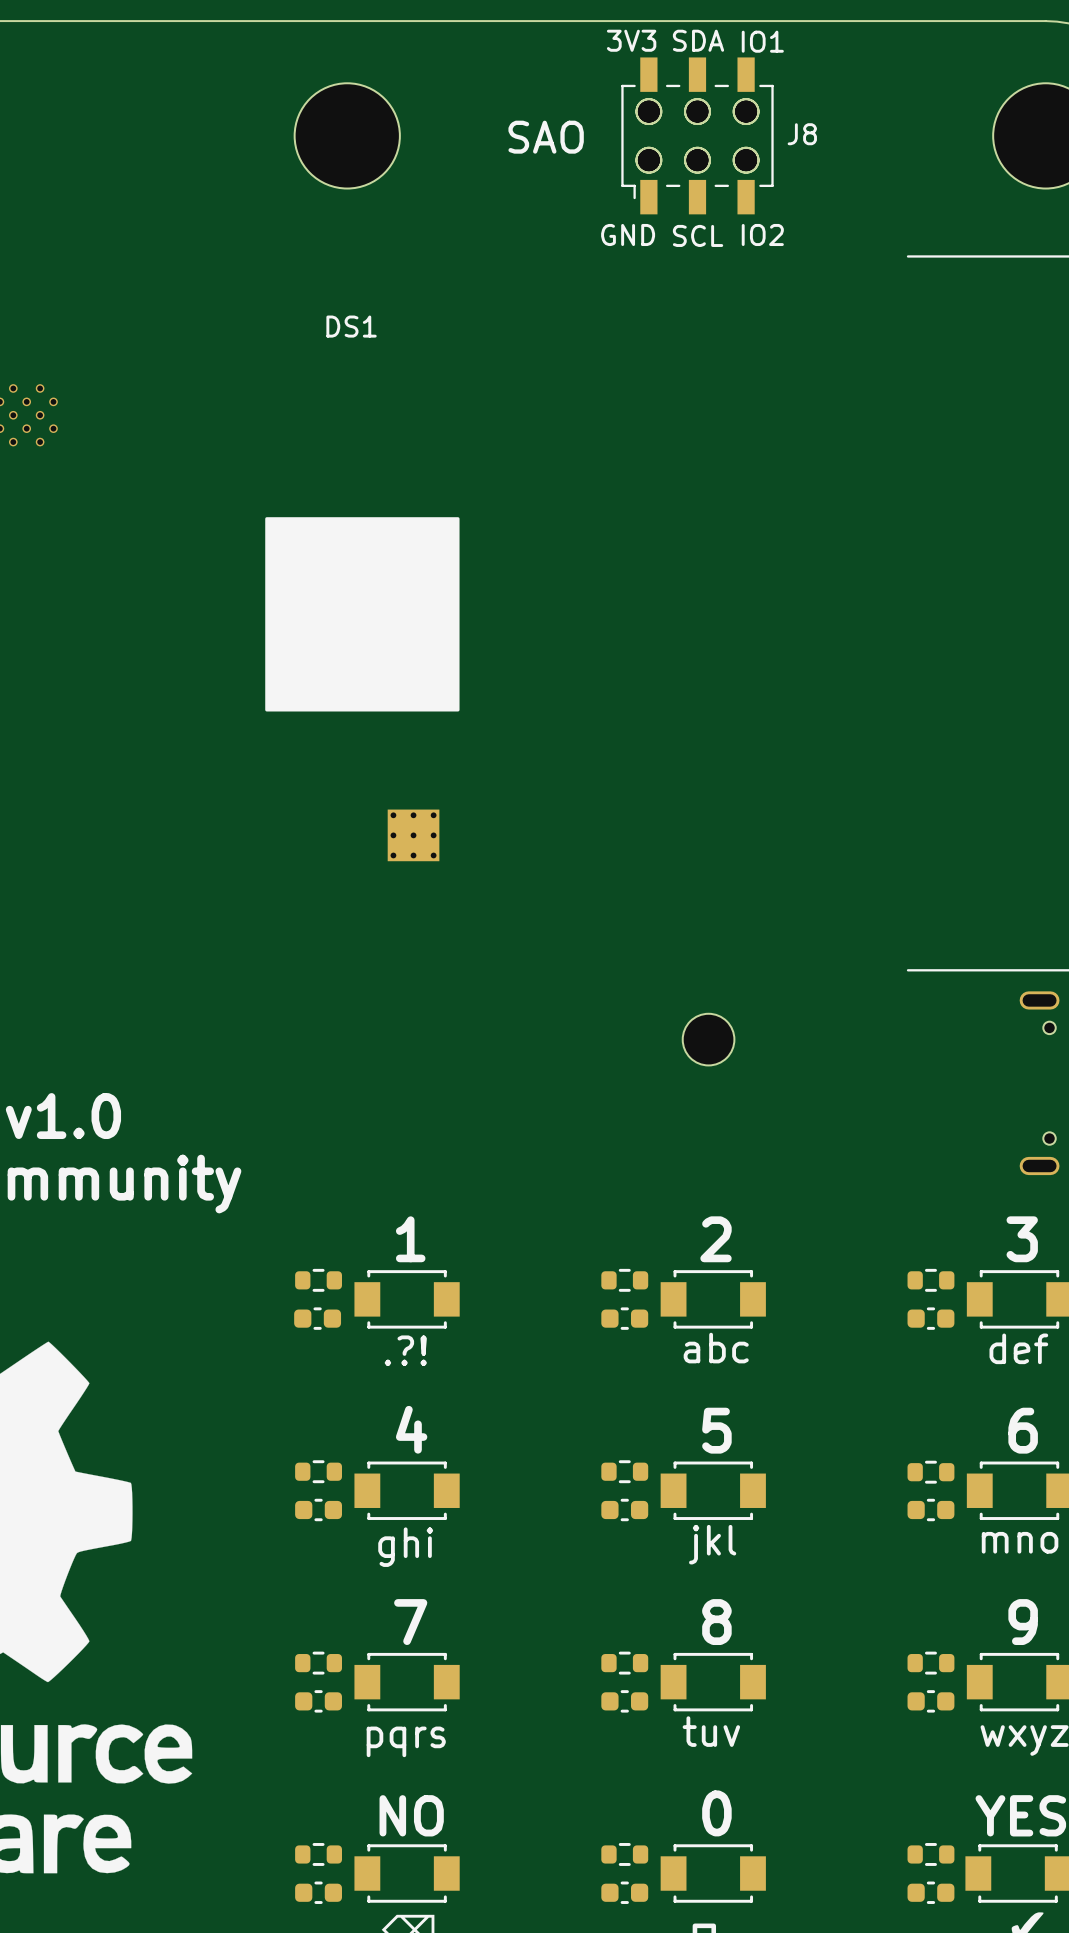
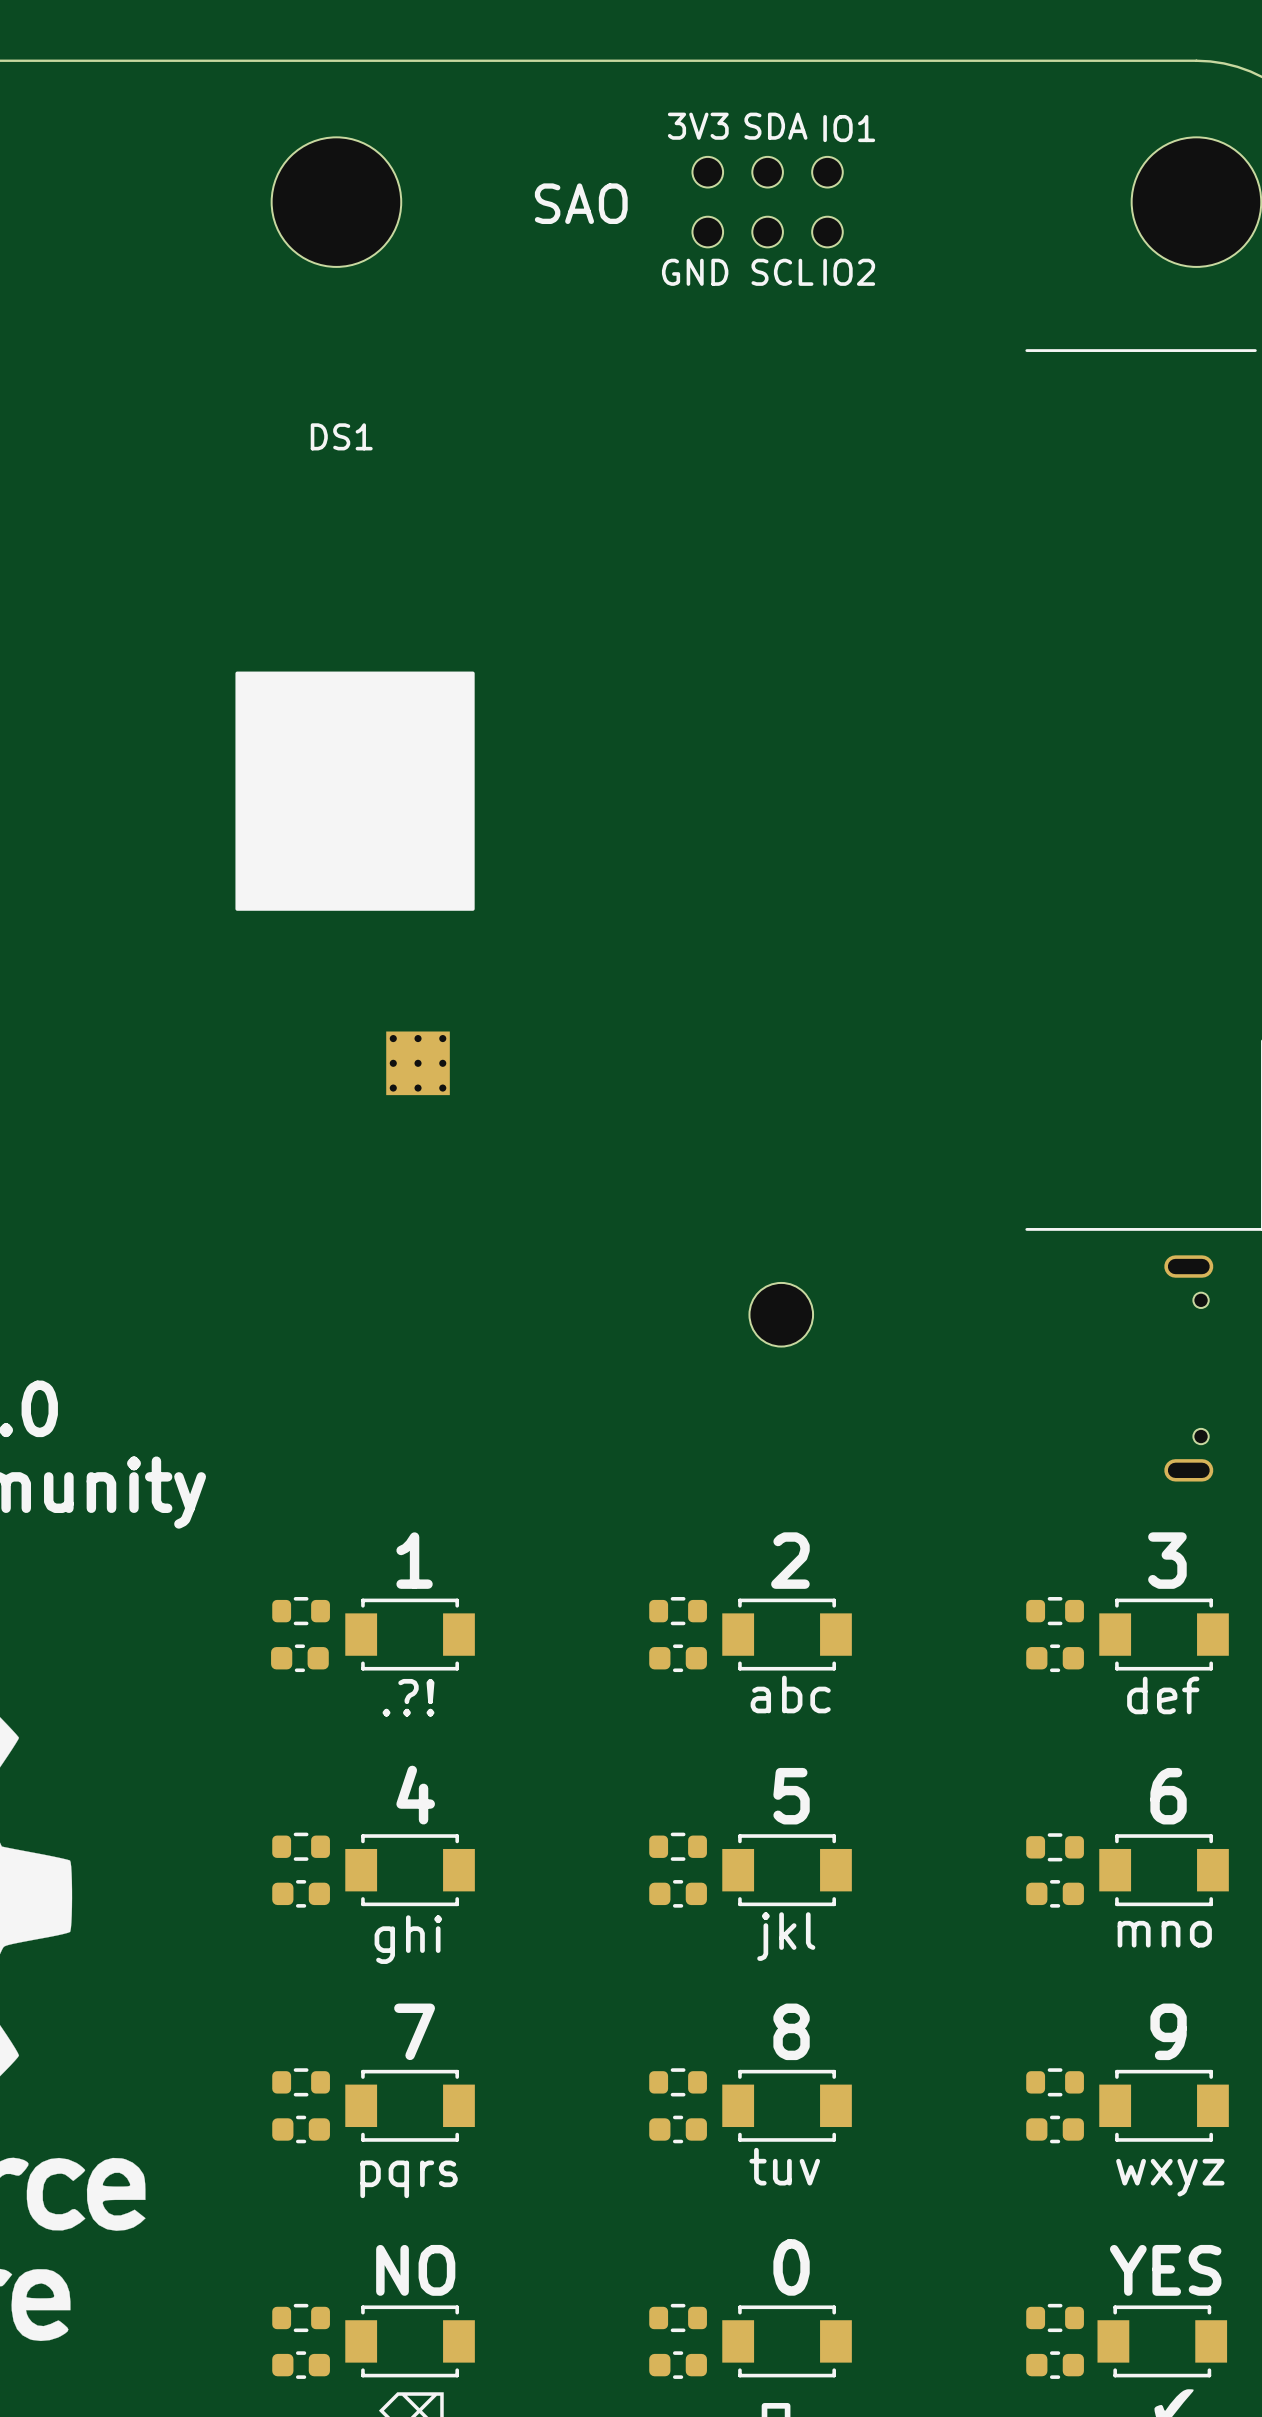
text position: 3V3 (631, 40) -> 3V3 (698, 126)
text position: SDA (698, 40) -> SDA (775, 126)
text position: IO1 (762, 41) -> IO1 (849, 128)
J8: (697, 135) -> none
text position: GND (628, 234) -> GND (695, 272)
text position: IO2 (762, 234) -> IO2 (849, 272)
text position: SCL (698, 235) -> SCL (782, 272)

